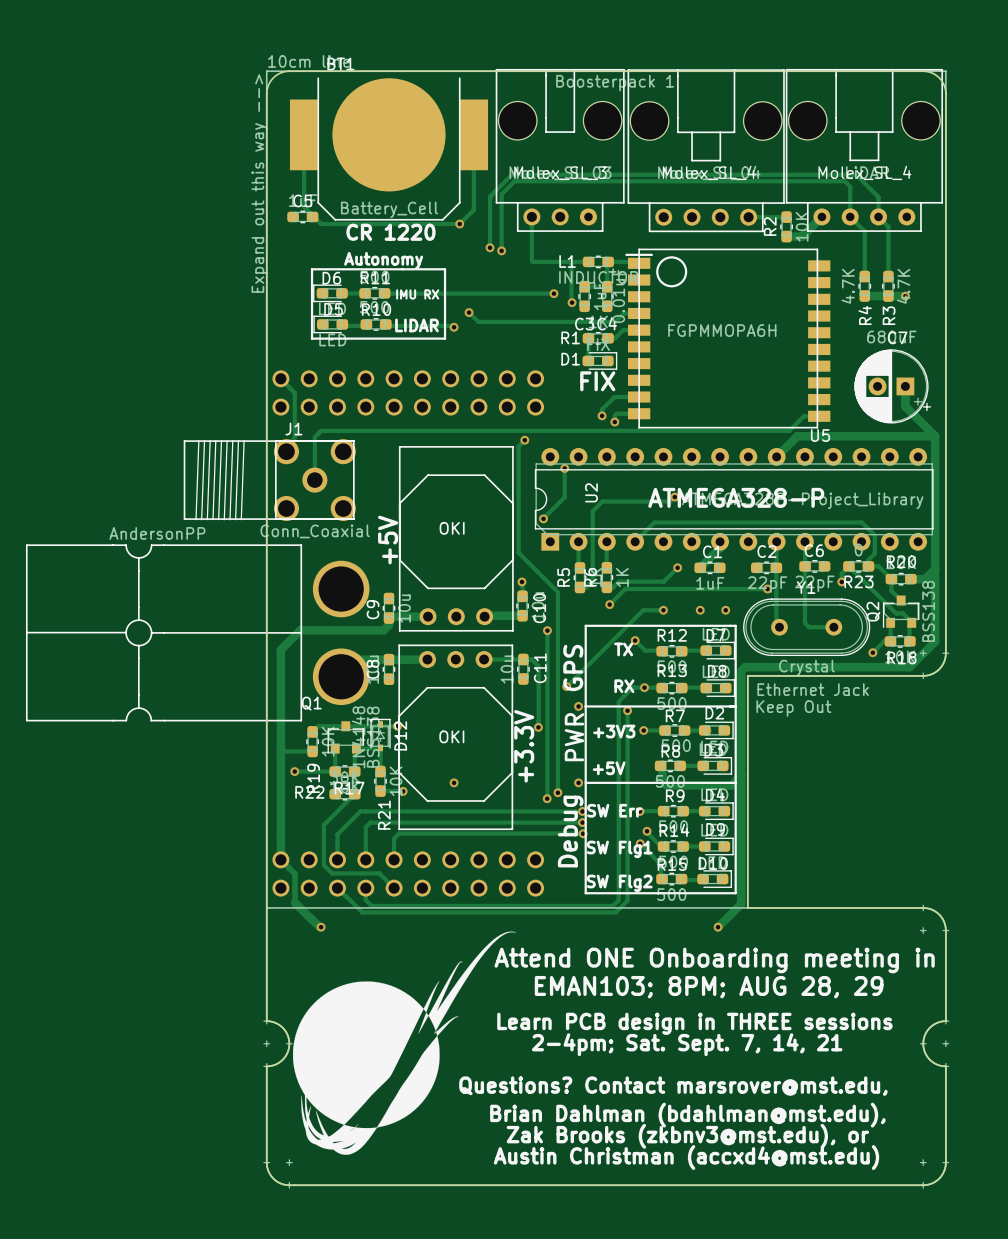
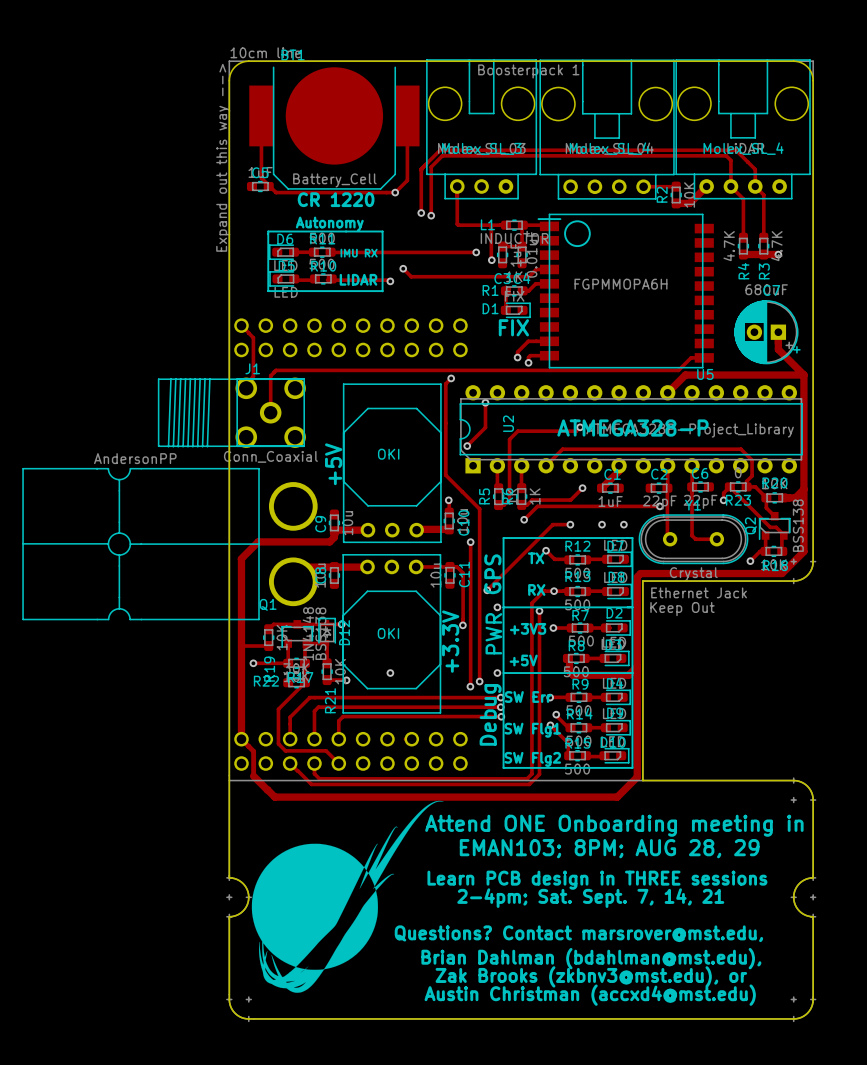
track: none -> (276, 797) (617, 797)
via: (321, 927) -> none
via: (718, 927) -> none

